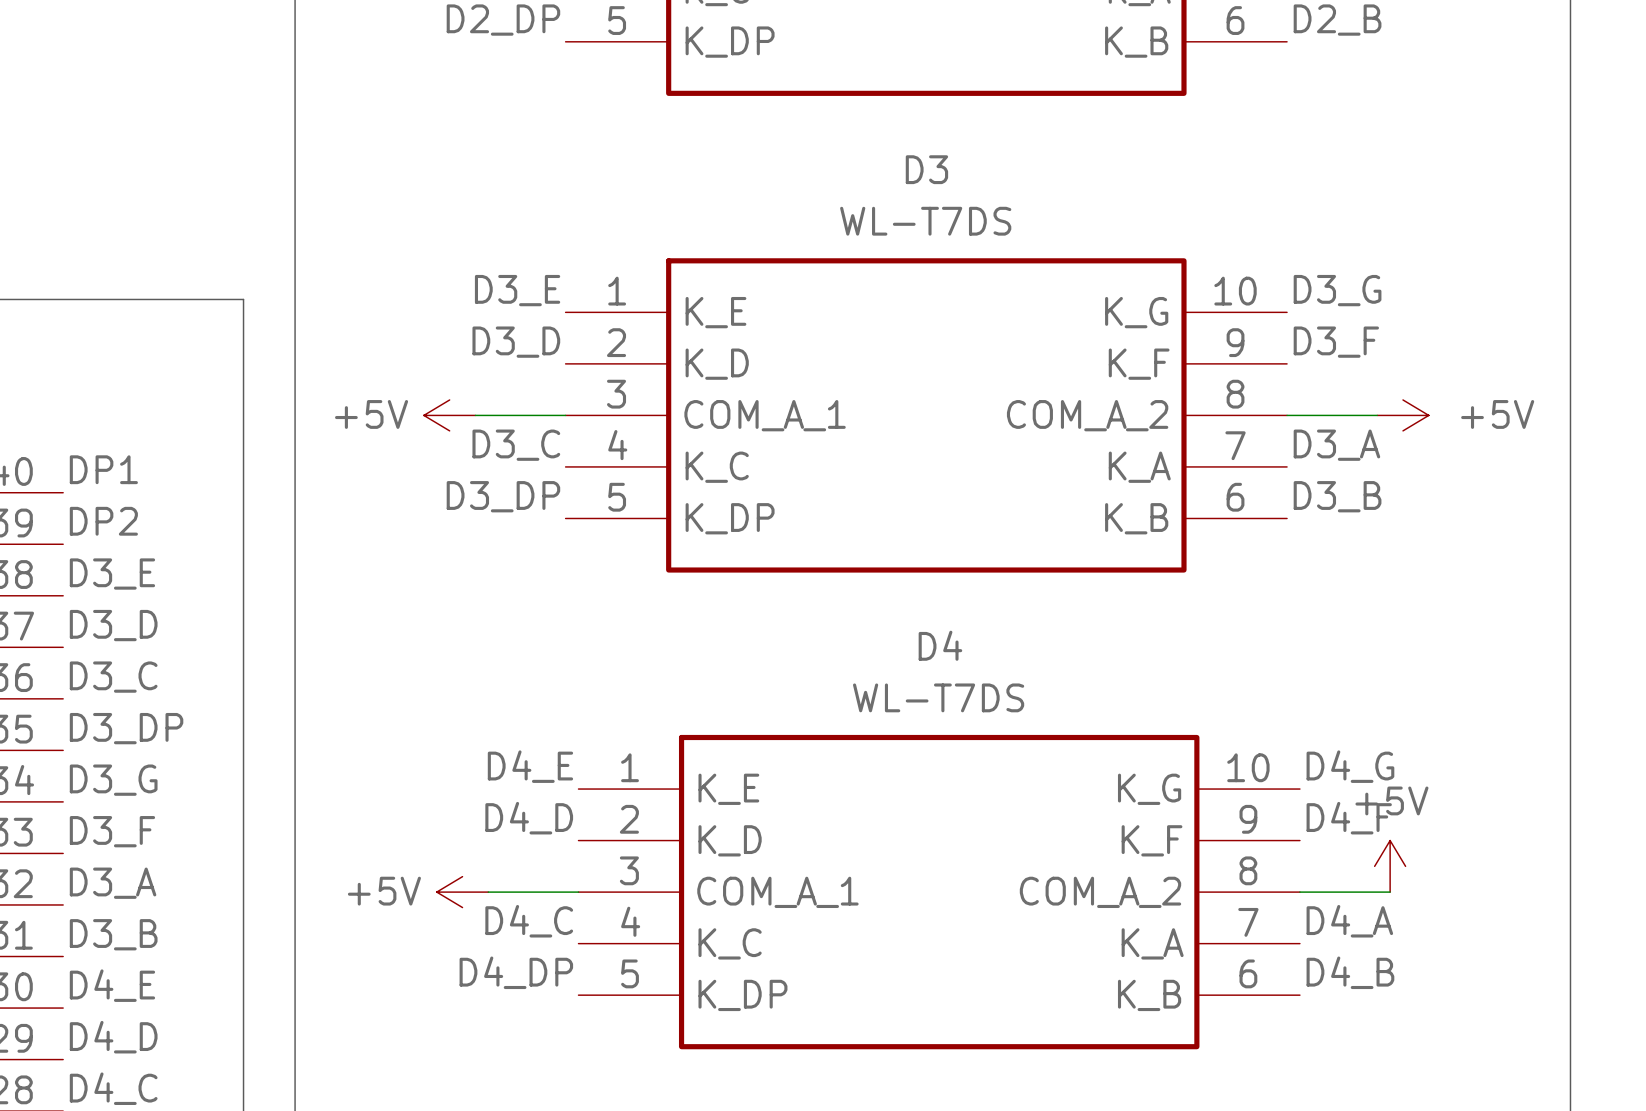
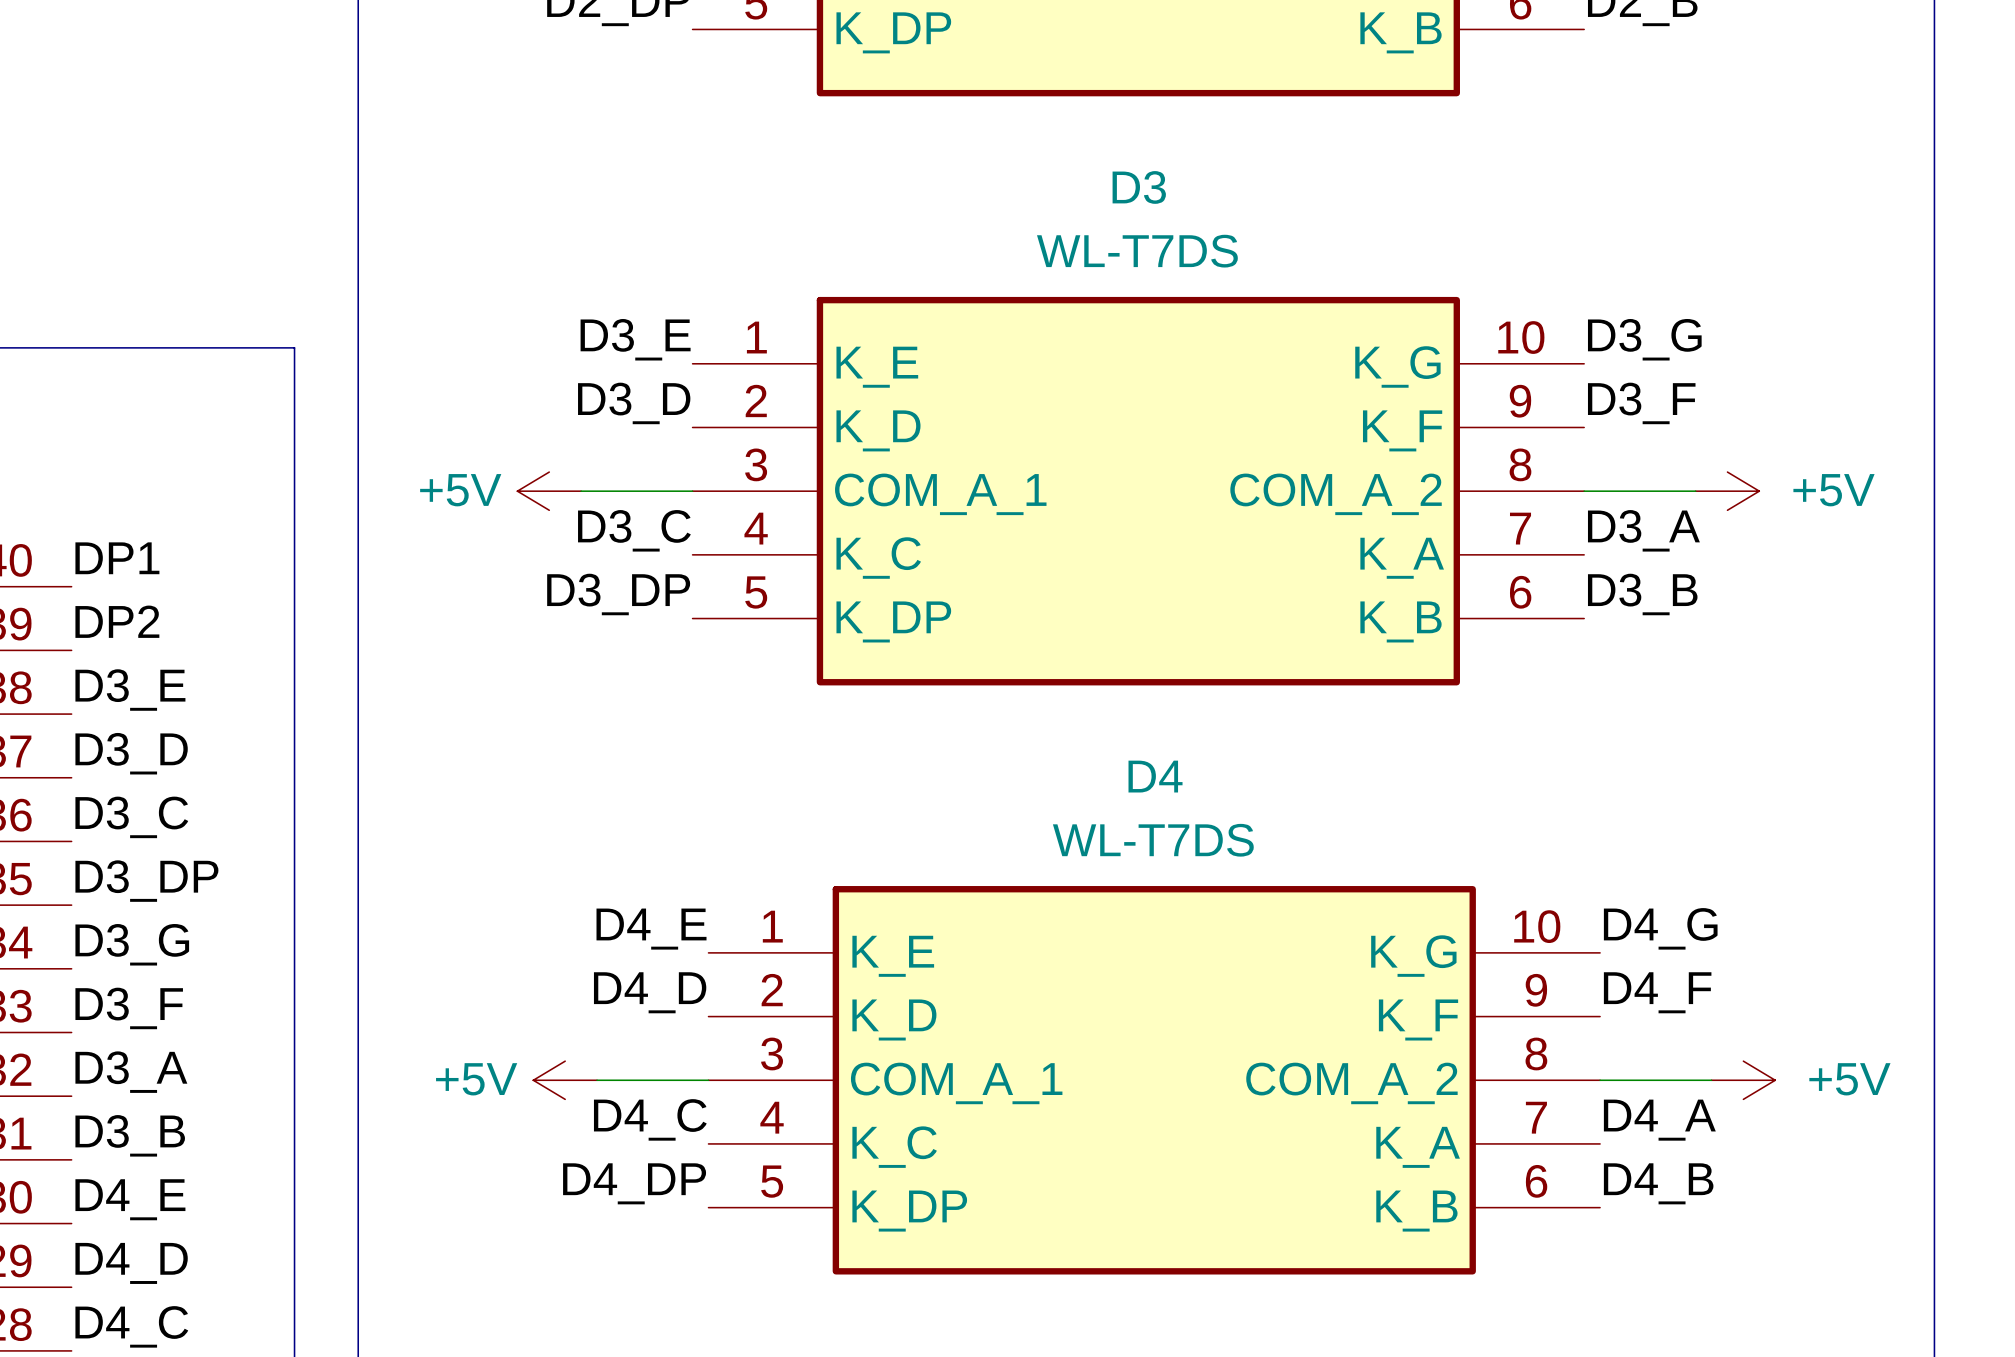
power symbol rotation: 0° (1390, 866) -> 90° clockwise (1743, 1080)
power symbol position: +5V (1390, 866) -> +5V (1743, 1080)

